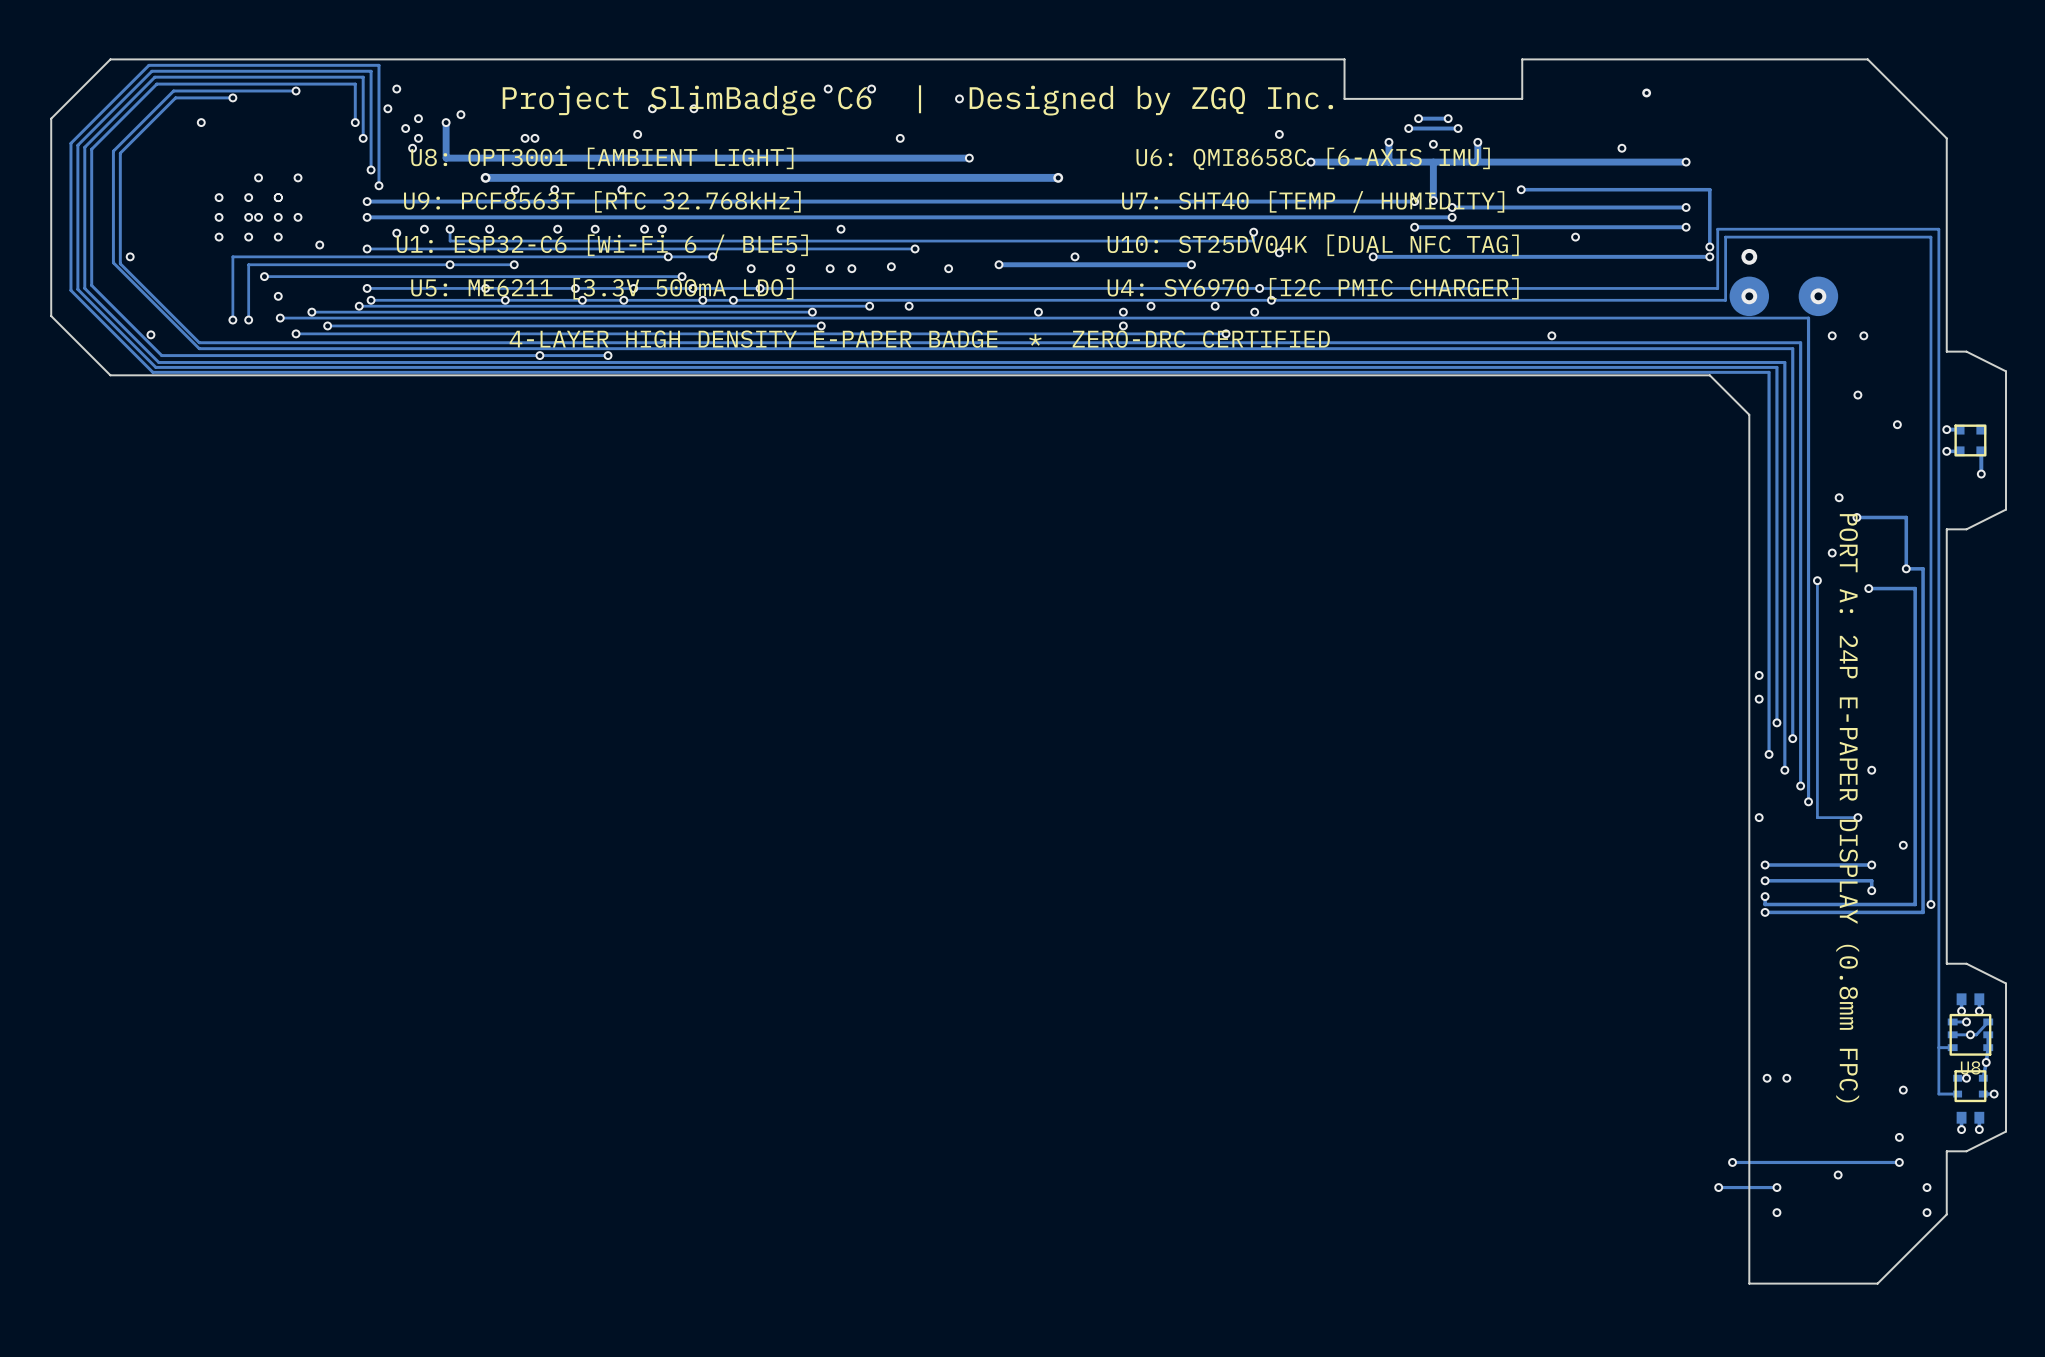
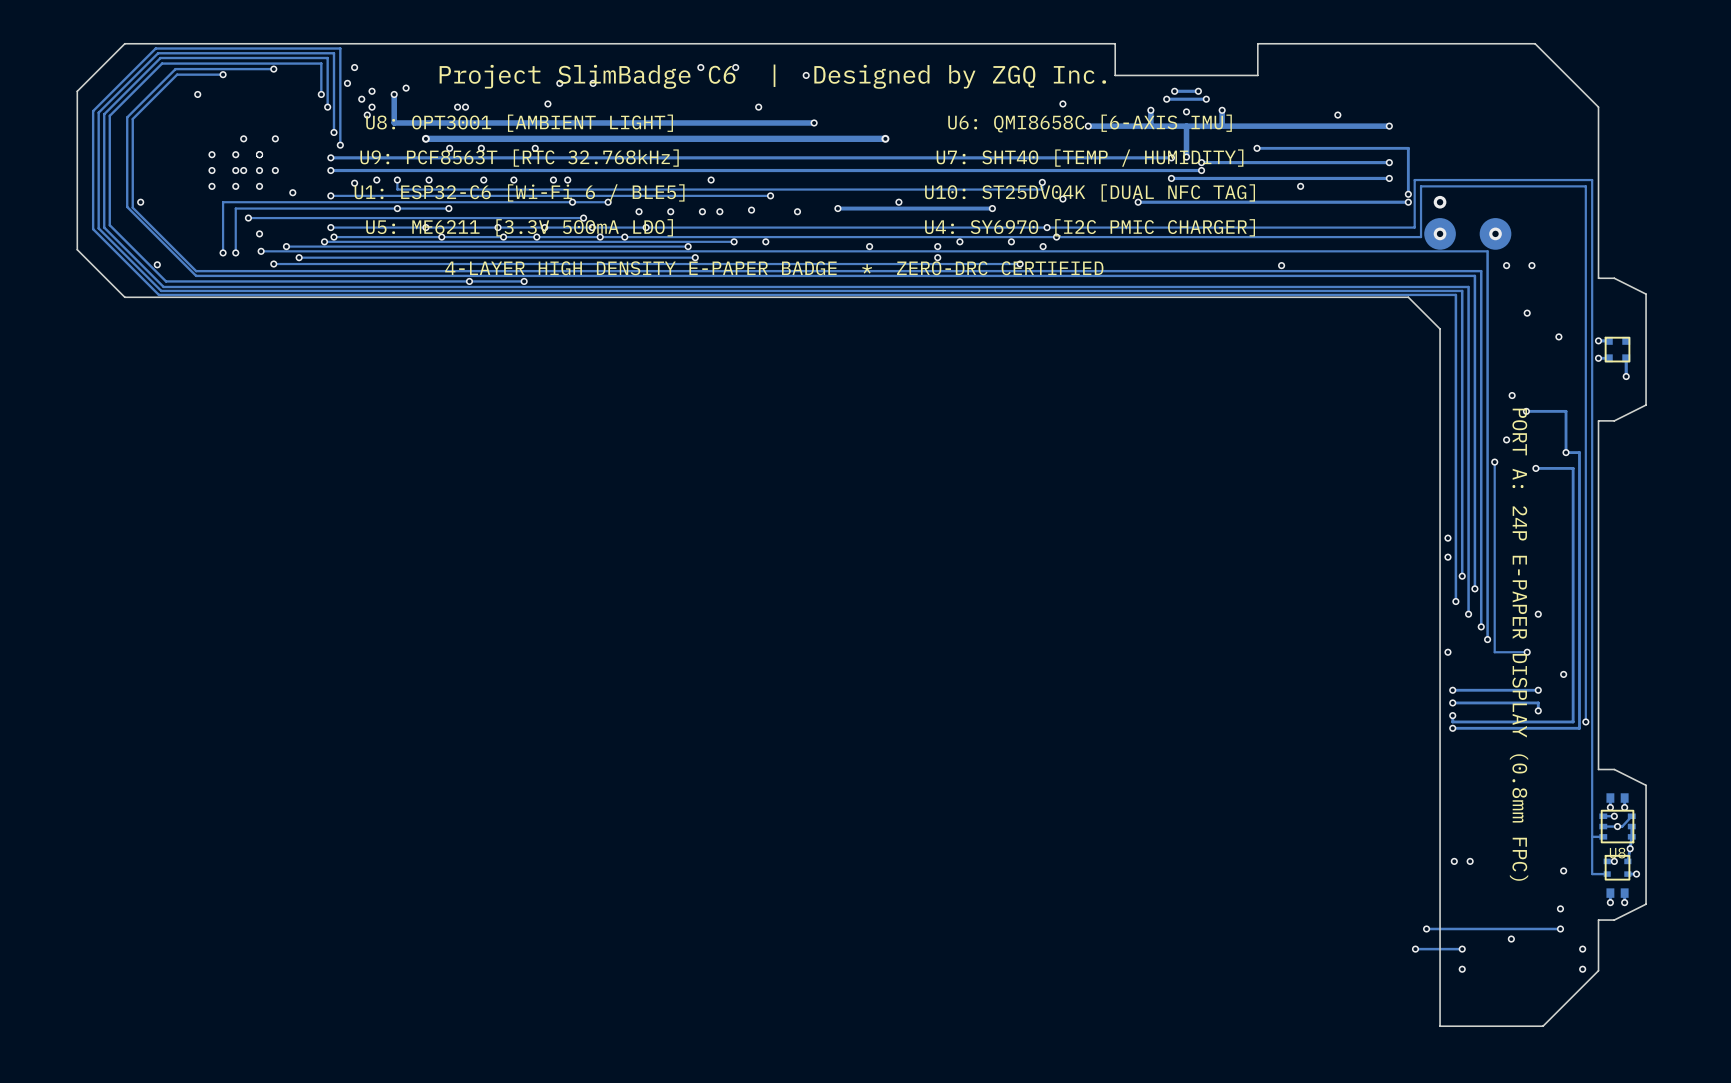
via: (1646, 92) -> none

